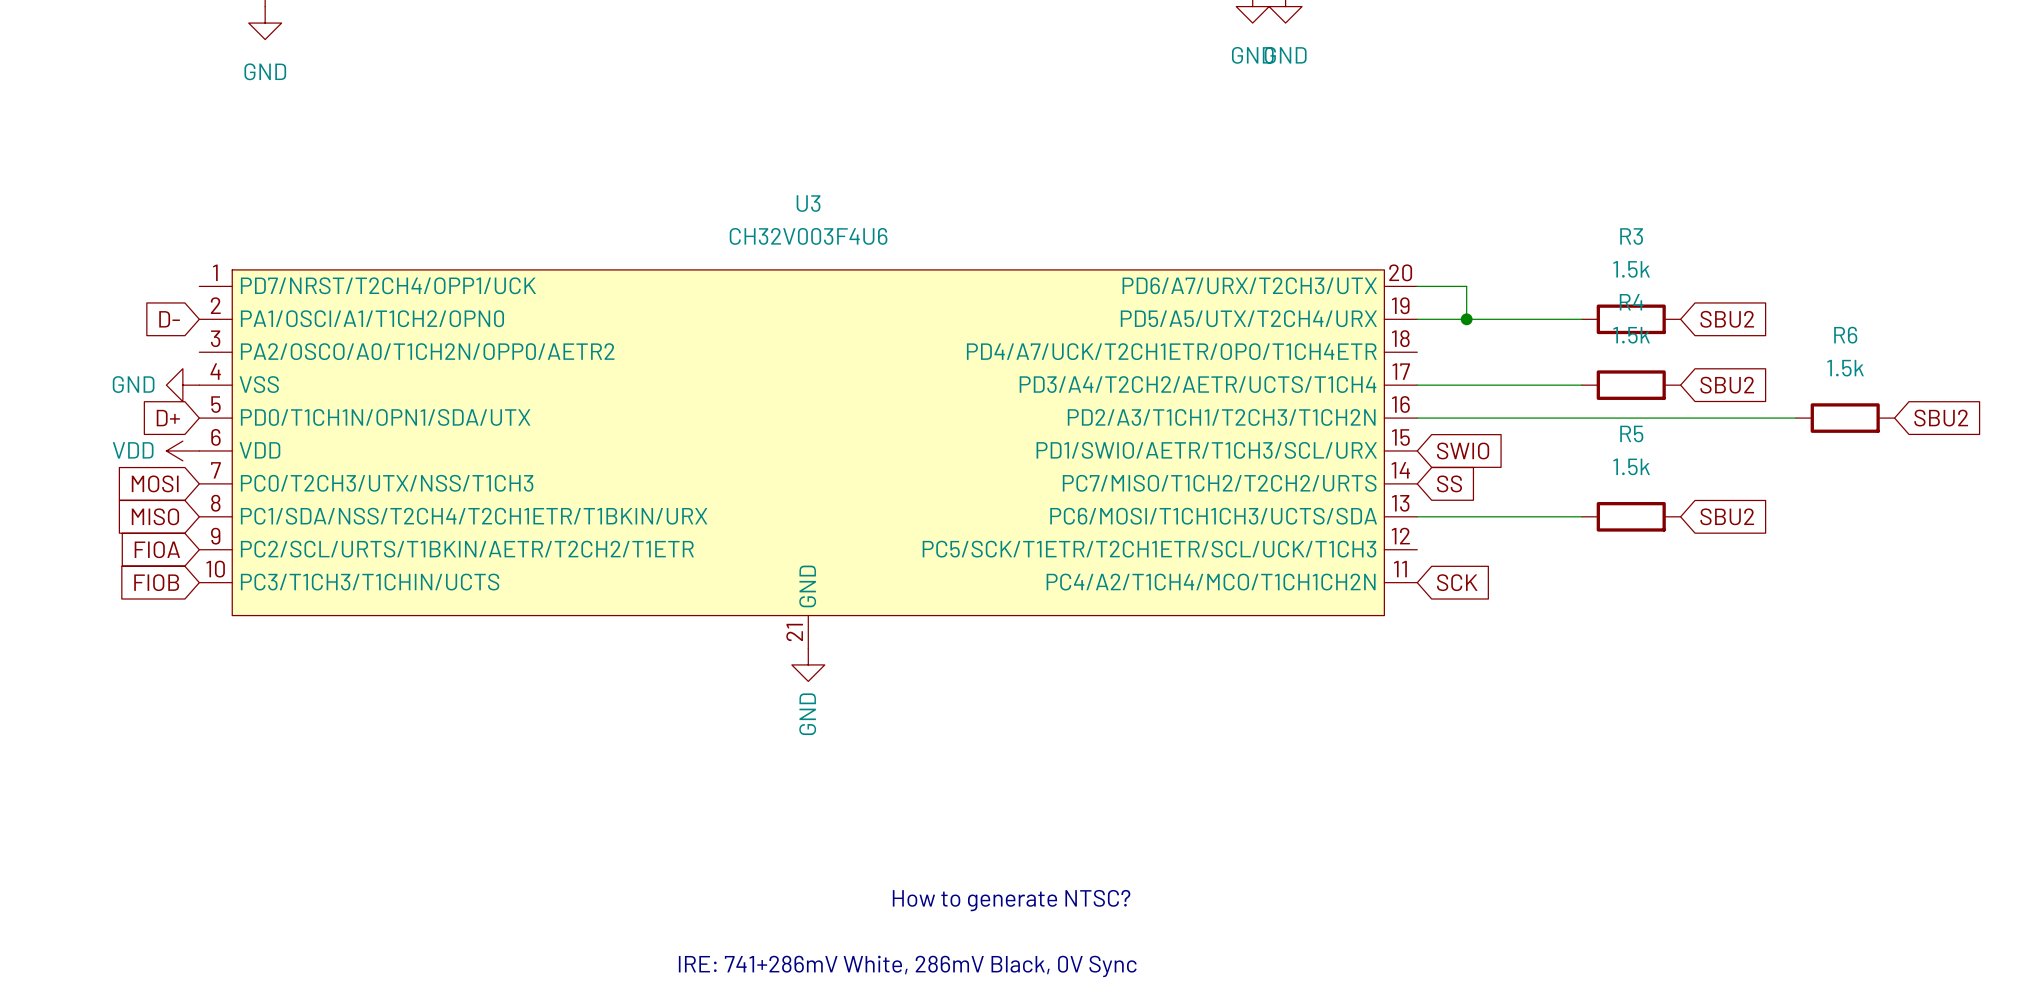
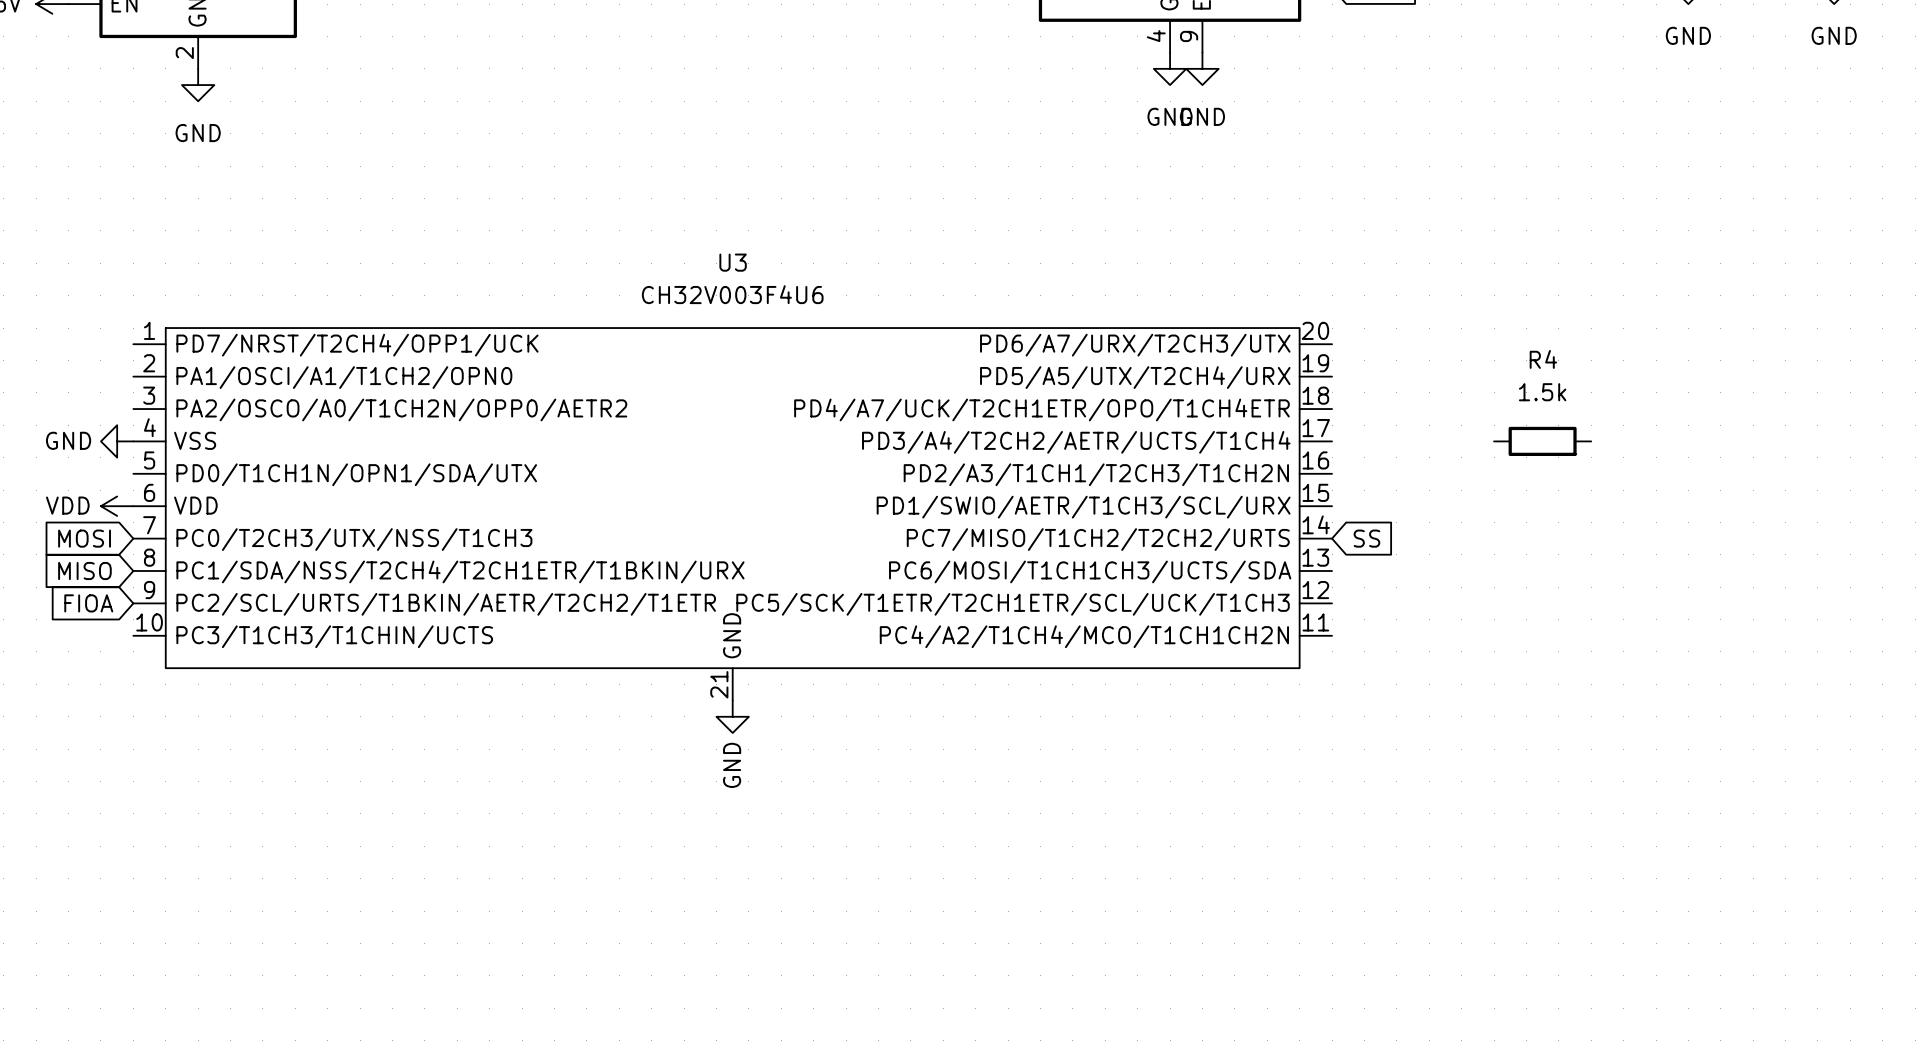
wire: (1417, 286) (1466, 286) (1466, 319) -> none
global label: D- (169, 319) -> none
wire: (1417, 319) (1581, 319) -> none
junction: (1466, 319) -> none
R3: 1.5k (1631, 319) -> none
global label: SBU2 (1727, 319) -> none
wire: (1417, 385) (1581, 385) -> none
global label: SBU2 (1727, 385) -> none
global label: D+ (168, 418) -> none
wire: (1417, 418) (1795, 418) -> none
R6: 1.5k (1845, 418) -> none
global label: SBU2 (1941, 418) -> none
global label: SWIO (1463, 450) -> none
wire: (1417, 516) (1581, 516) -> none
R5: 1.5k (1631, 516) -> none
global label: SBU2 (1727, 516) -> none
global label: FIOB (156, 582) -> none
global label: SCK (1457, 582) -> none
text: How to generate NTSC? (1011, 900) -> none
text: IRE: 741+286mV White, 286mV Black, 0V Sync (907, 966) -> none

